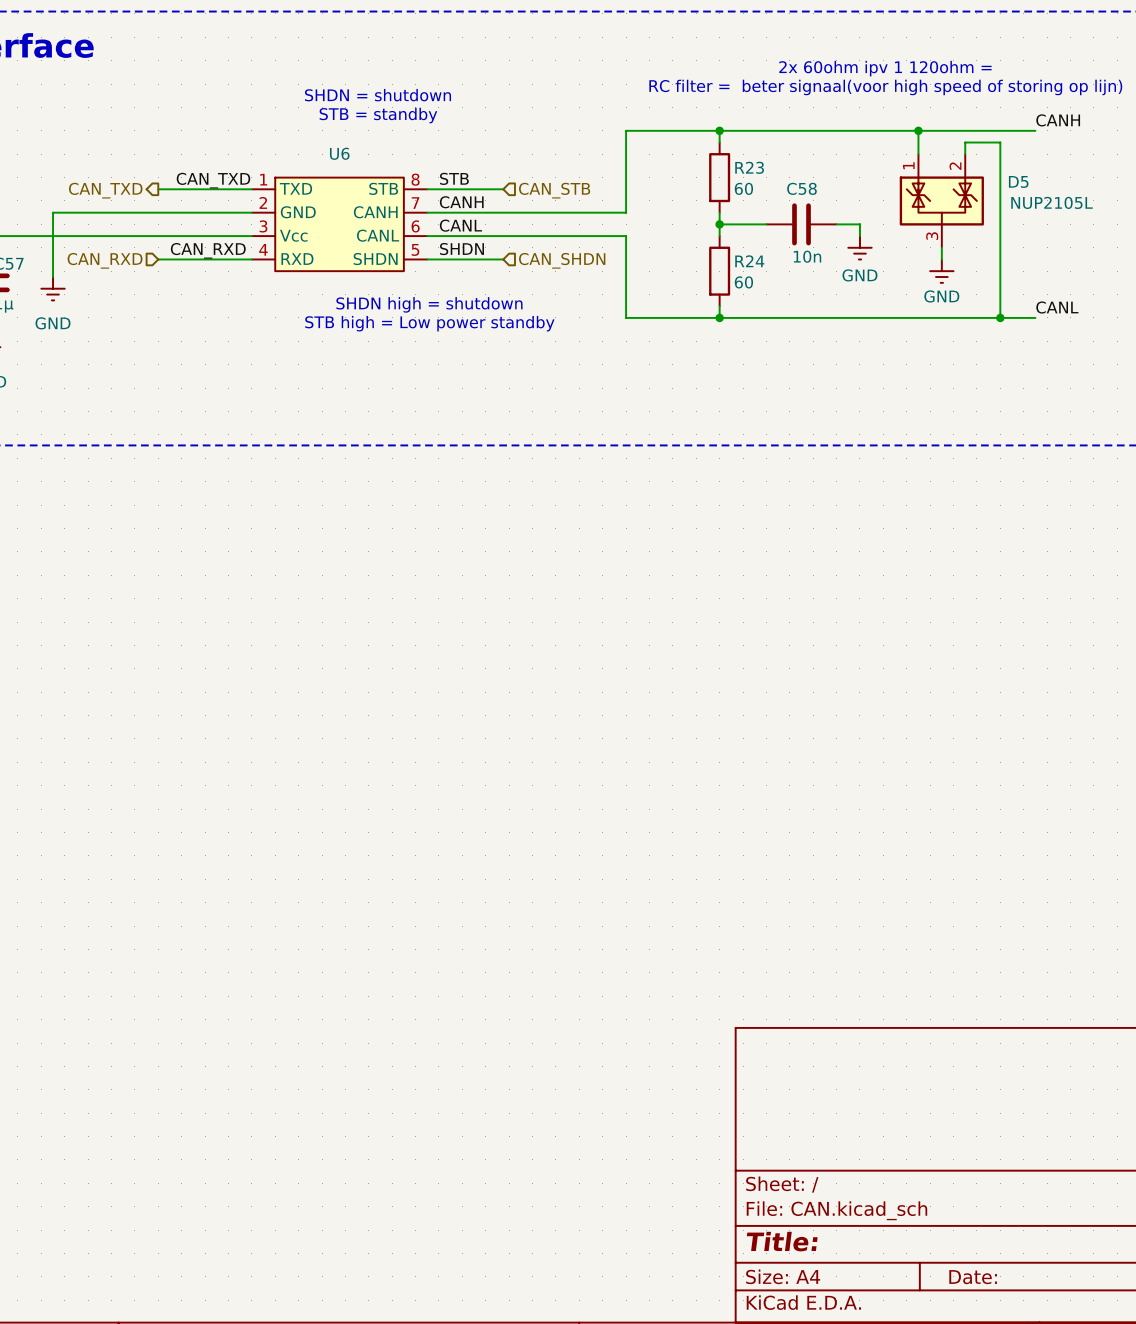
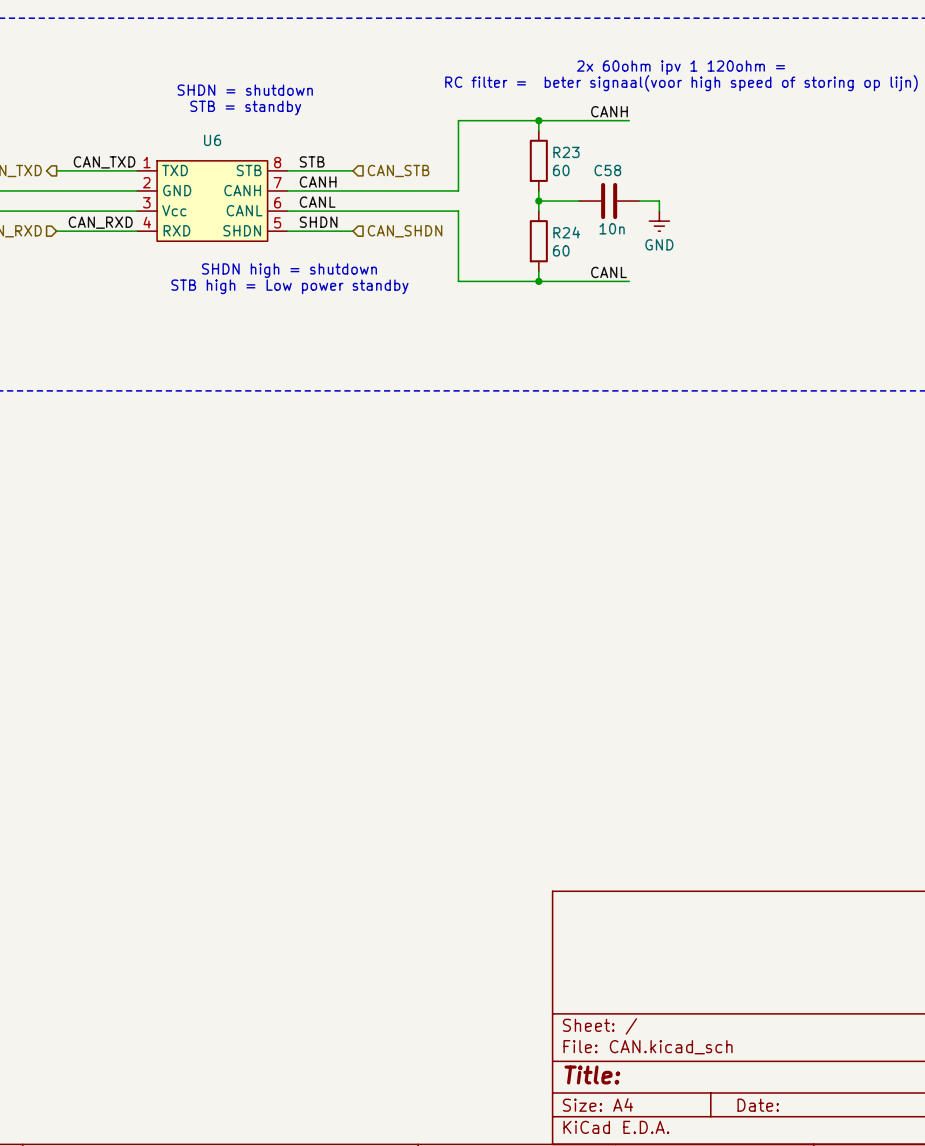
label: none -> CANH (609, 111)
label: CANH (1058, 120) -> none
wire: (824, 130) (1035, 130) -> none
wire: (918, 130) (918, 154) -> none
junction: (918, 130) -> none
wire: (965, 154) (965, 142) (1000, 142) (1000, 317) -> none
D5: NUP2105L (941, 200) -> none
wire: (941, 247) (941, 259) -> none
power symbol: GND (941, 271) -> none
label: none -> CANL (608, 272)
label: CANL (1057, 307) -> none
wire: (824, 317) (1035, 317) -> none
junction: (1000, 317) -> none

